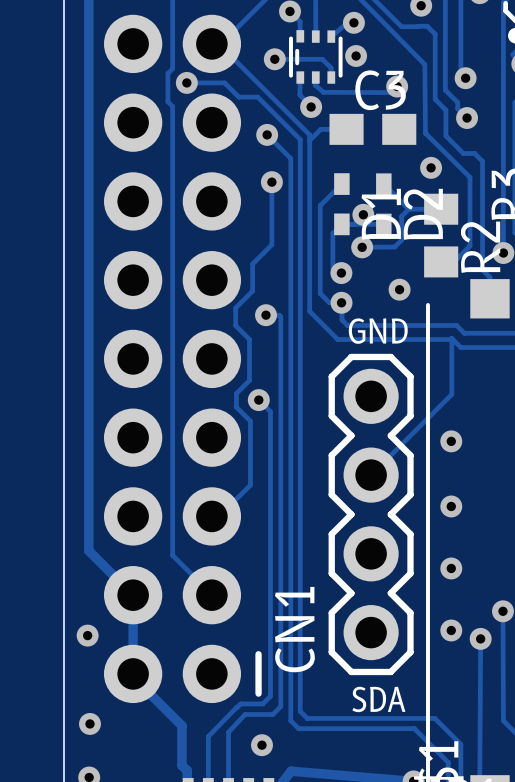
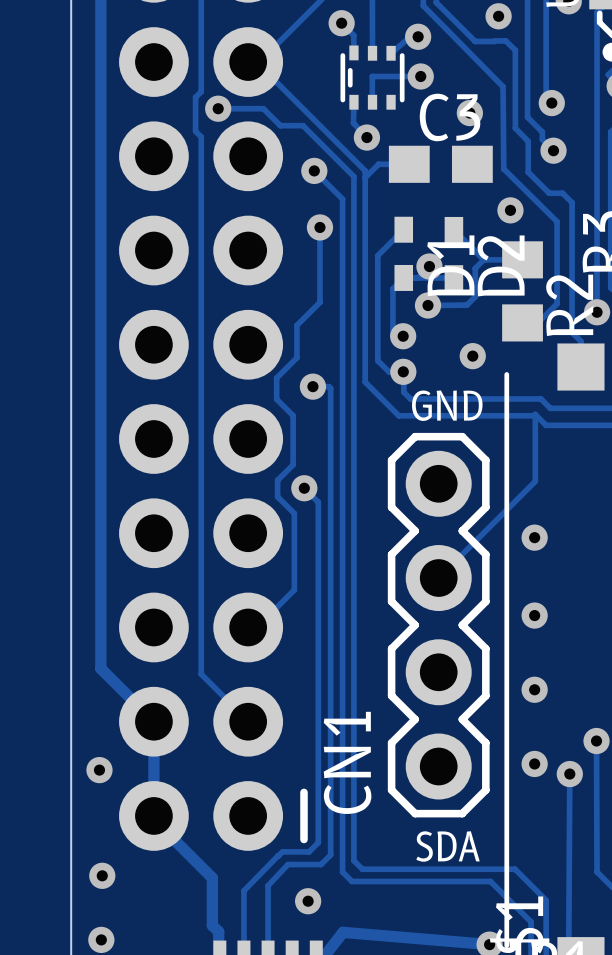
track: none -> (420, 76) (372, 76) (372, 105)
track: (274, 59) (322, 59) (331, 68) (331, 77) -> none
via: (274, 59) -> none
track: (315, 77) (315, 85) (323, 92) (389, 92) (397, 86) -> none

